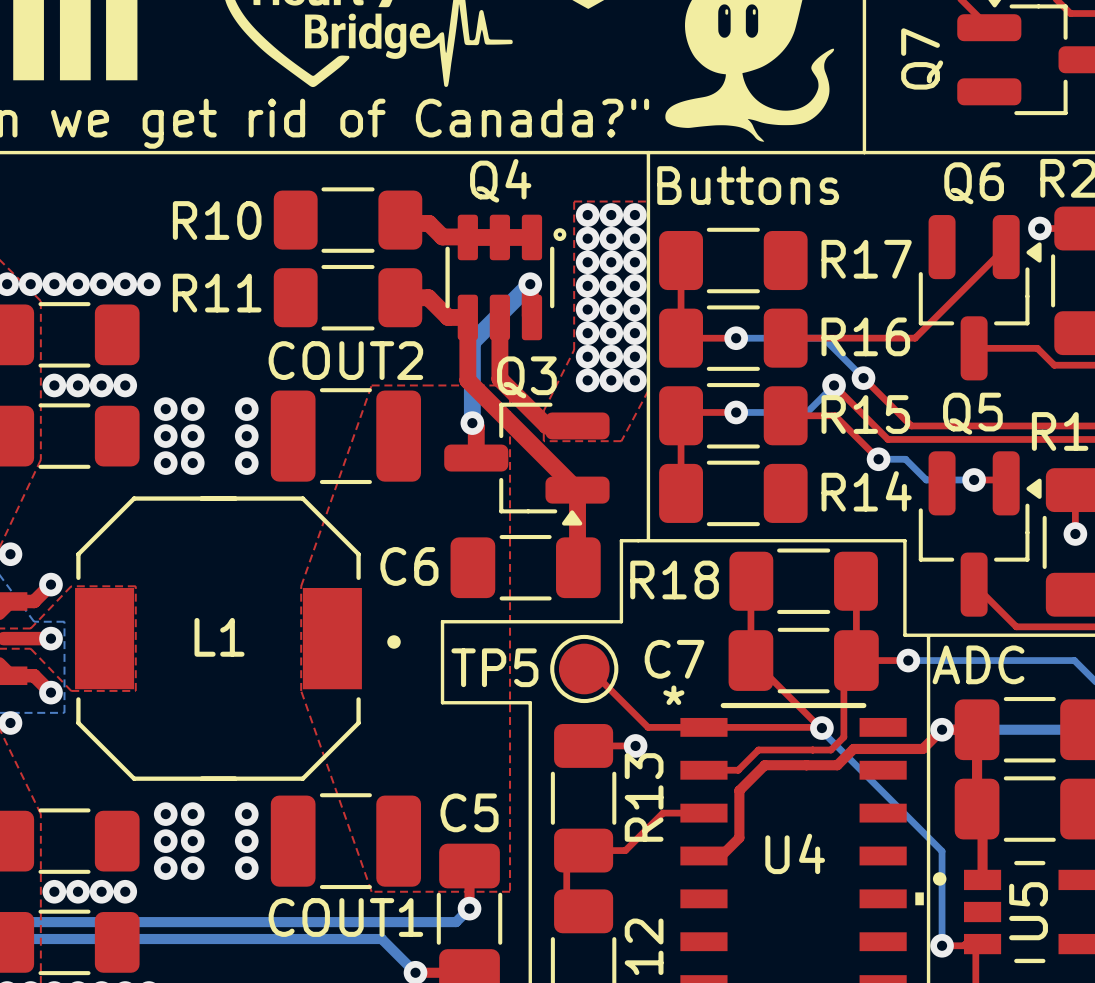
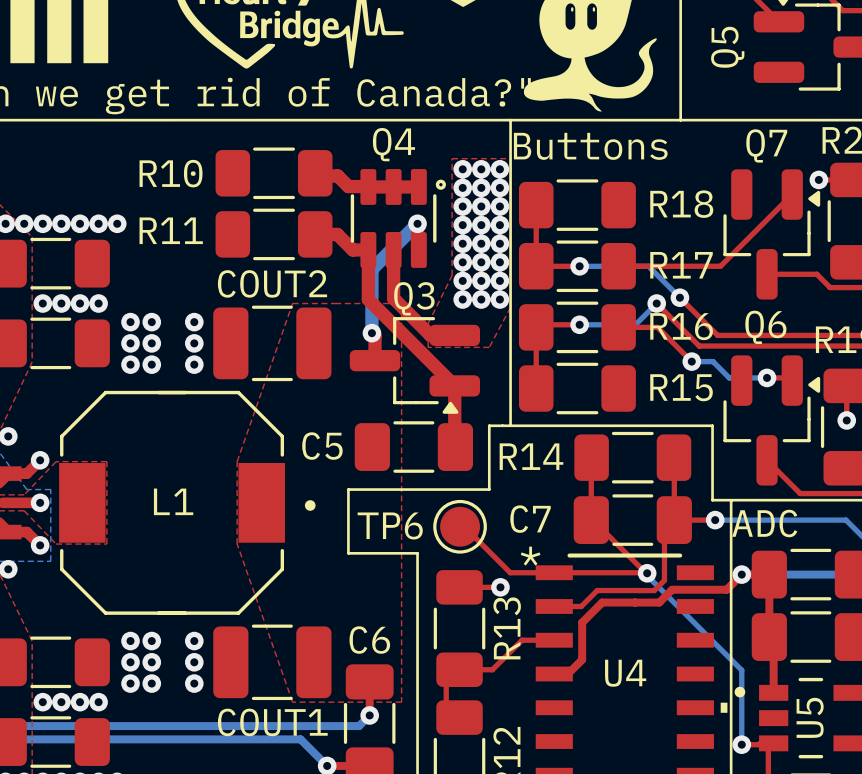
Q7 name: Q7 (922, 58) -> Q5 (727, 47)
Q6 name: Q6 (974, 183) -> Q7 (766, 145)
R17 name: R17 (866, 259) -> R18 (681, 204)
R16 name: R16 (865, 336) -> R17 (681, 265)
Q5 name: Q5 (972, 413) -> Q6 (765, 327)
R15 name: R15 (865, 414) -> R16 (681, 326)
R14 name: R14 (866, 491) -> R15 (681, 387)
C6 name: C6 (409, 566) -> C5 (322, 446)
R18 name: R18 (674, 579) -> R14 (531, 456)
TP5 name: TP5 (494, 667) -> TP6 (390, 525)
C5 name: C5 (469, 812) -> C6 (369, 640)

